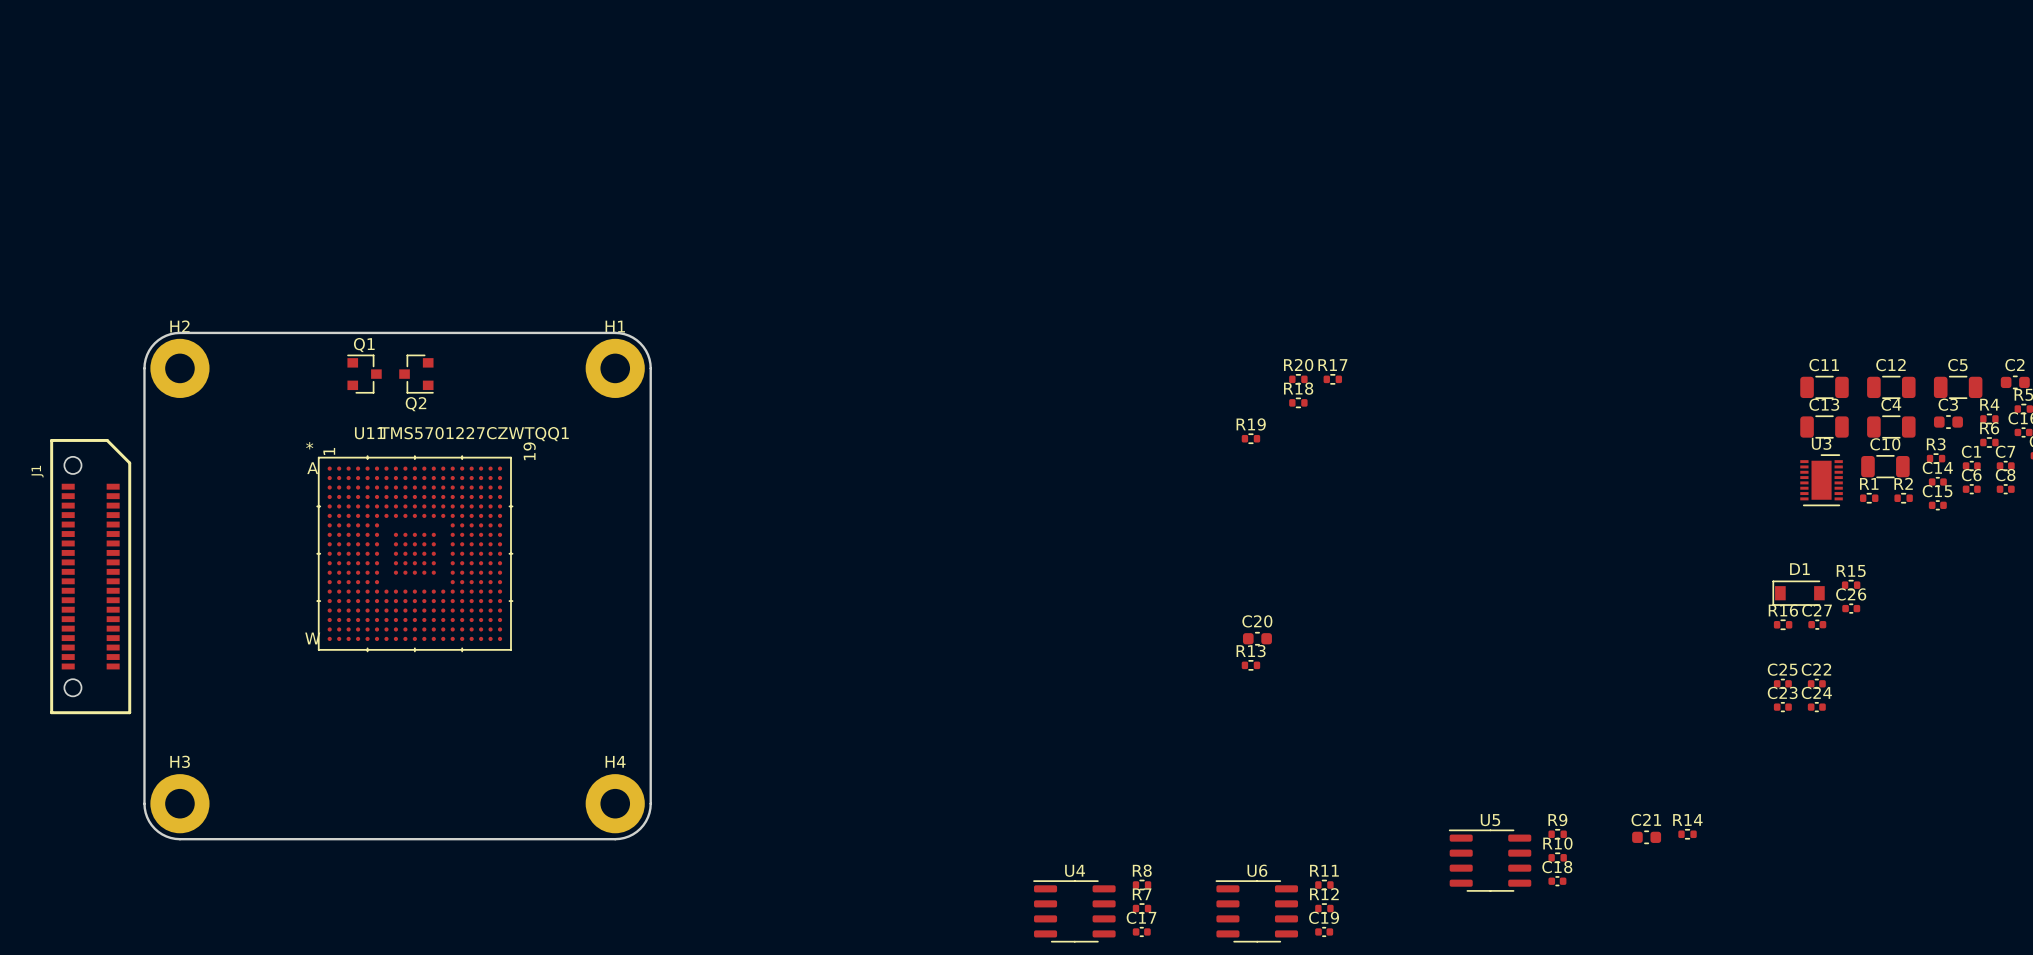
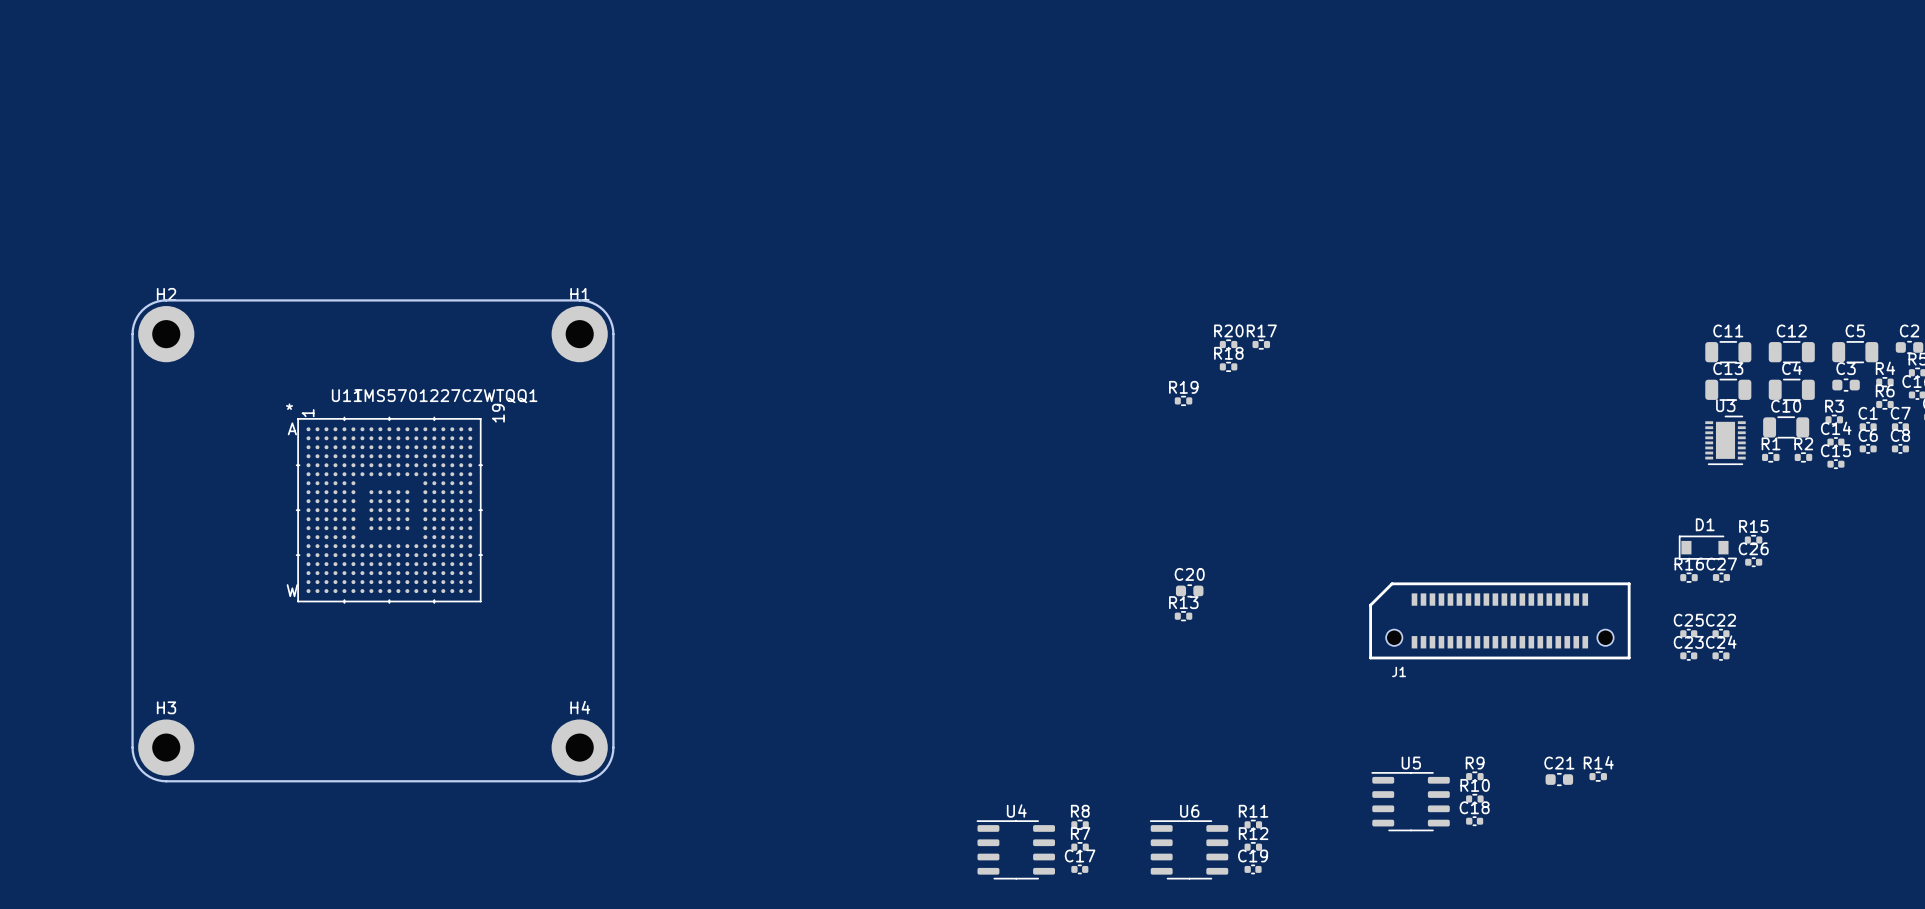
Q1: (364, 374) -> none
Q2: (416, 374) -> none
J1 rotation: 0° (90, 576) -> 90° counterclockwise (1499, 620)
J1 position: (90, 576) -> (1499, 620)

